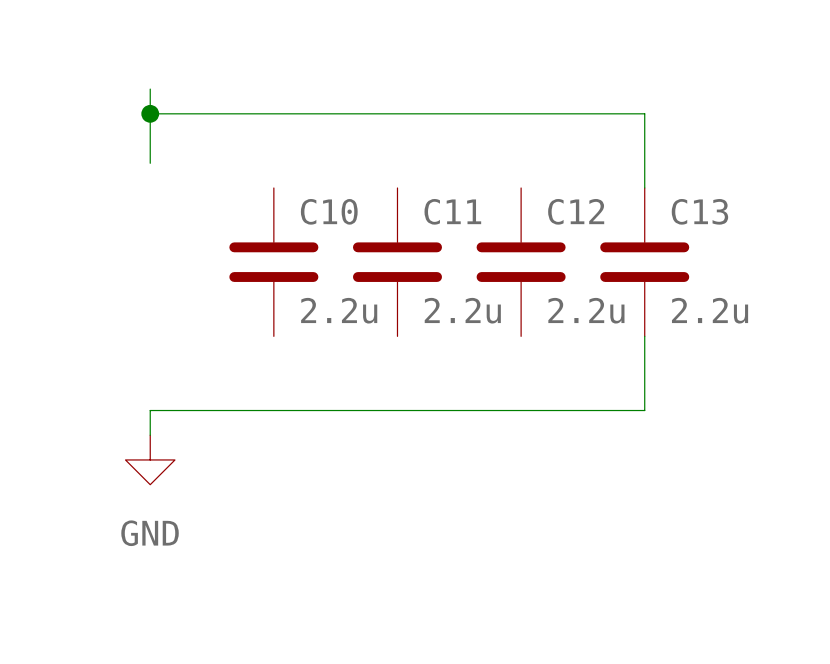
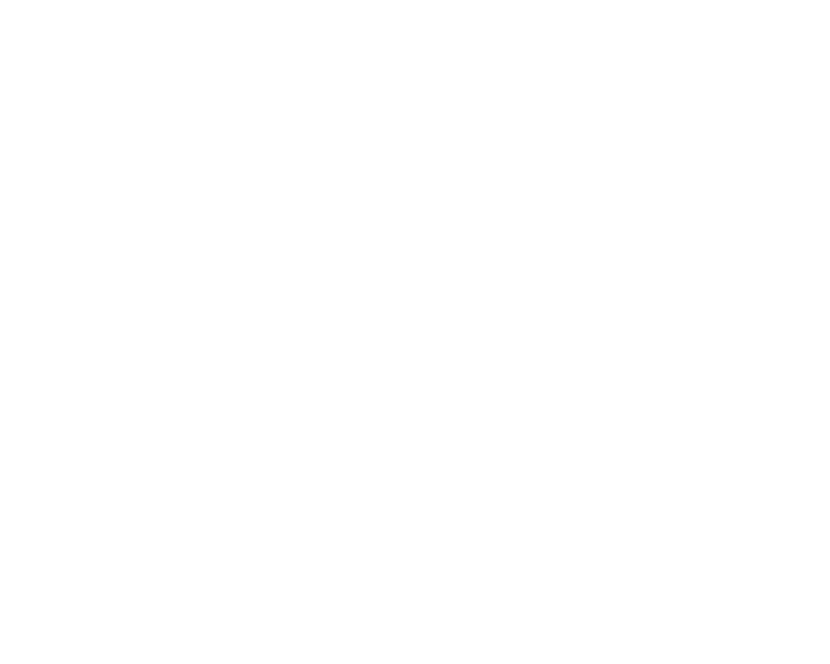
wire: (150, 89) (150, 163) -> none
wire: (150, 113) (644, 113) (644, 188) -> none
junction: (150, 113) -> none
C10: 2.2u (273, 262) -> none
C11: 2.2u (397, 262) -> none
C12: 2.2u (521, 262) -> none
C13: 2.2u (644, 262) -> none
wire: (644, 336) (644, 410) (150, 410) (150, 435) -> none
power symbol: GND (150, 459) -> none

